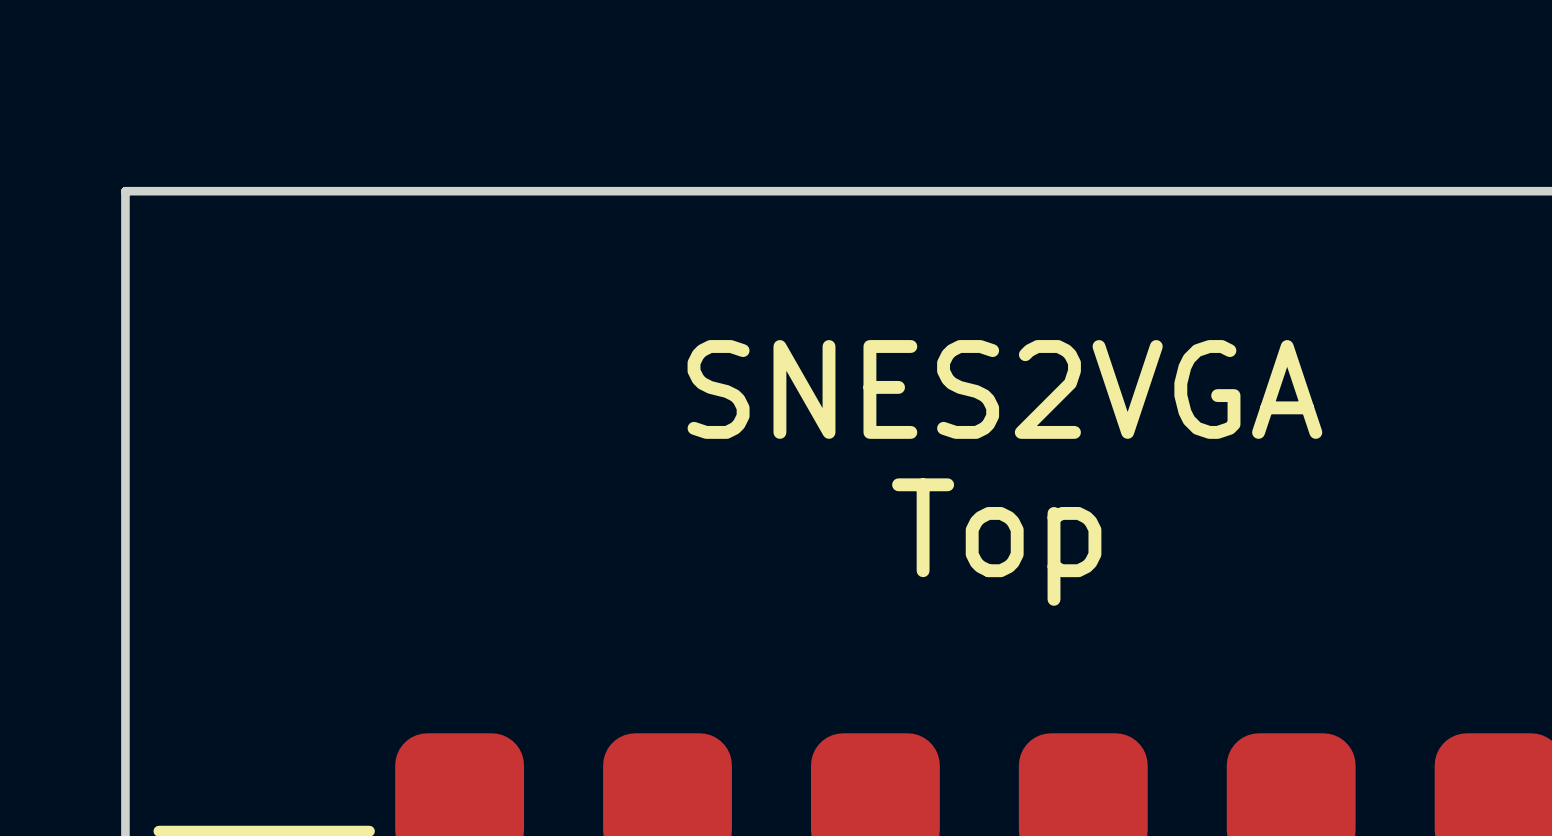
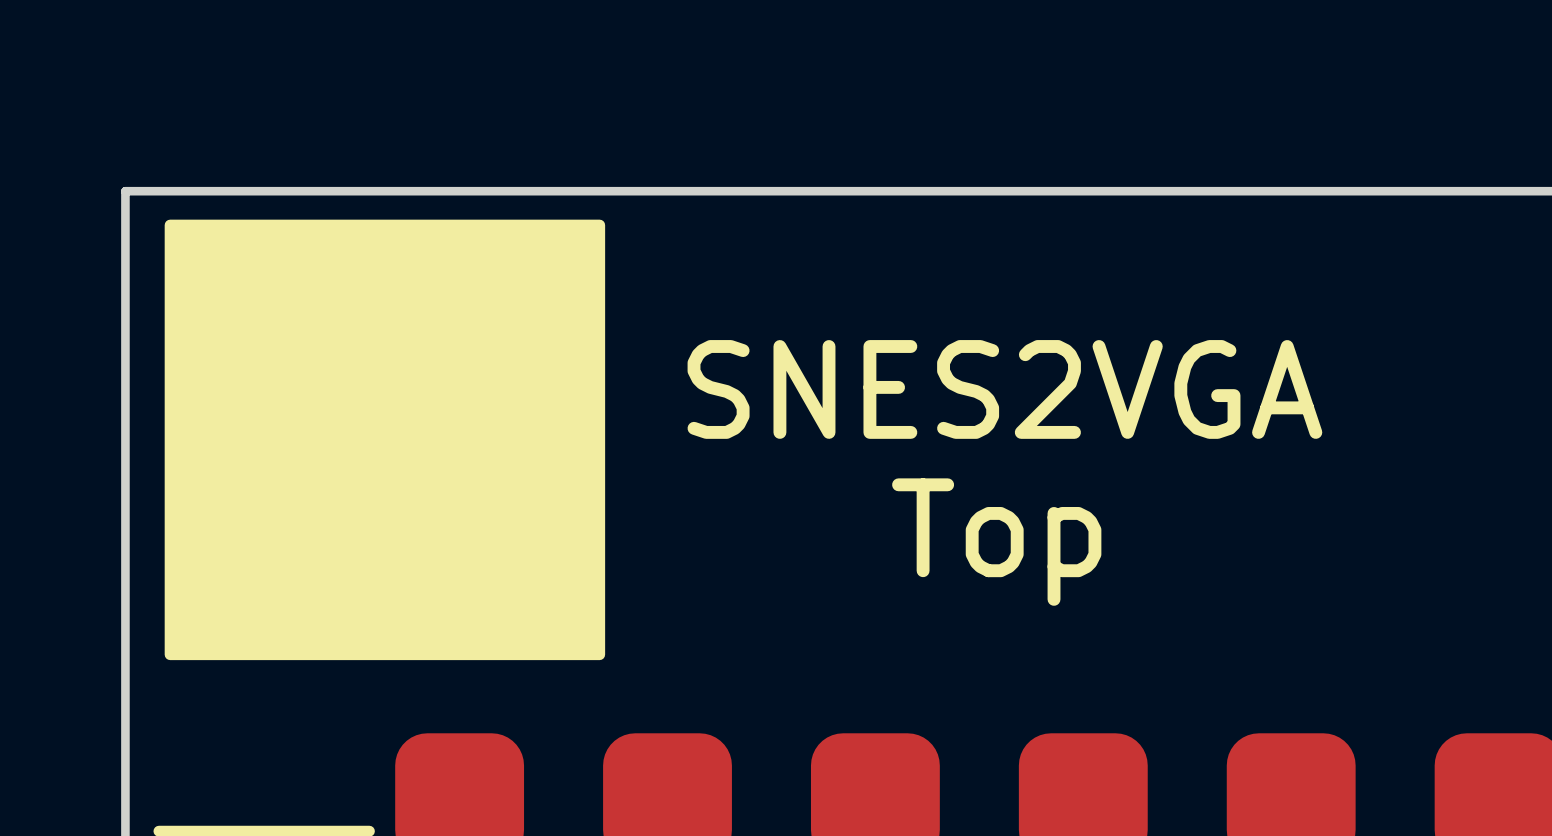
drawing: none -> [164, 219, 606, 661]

